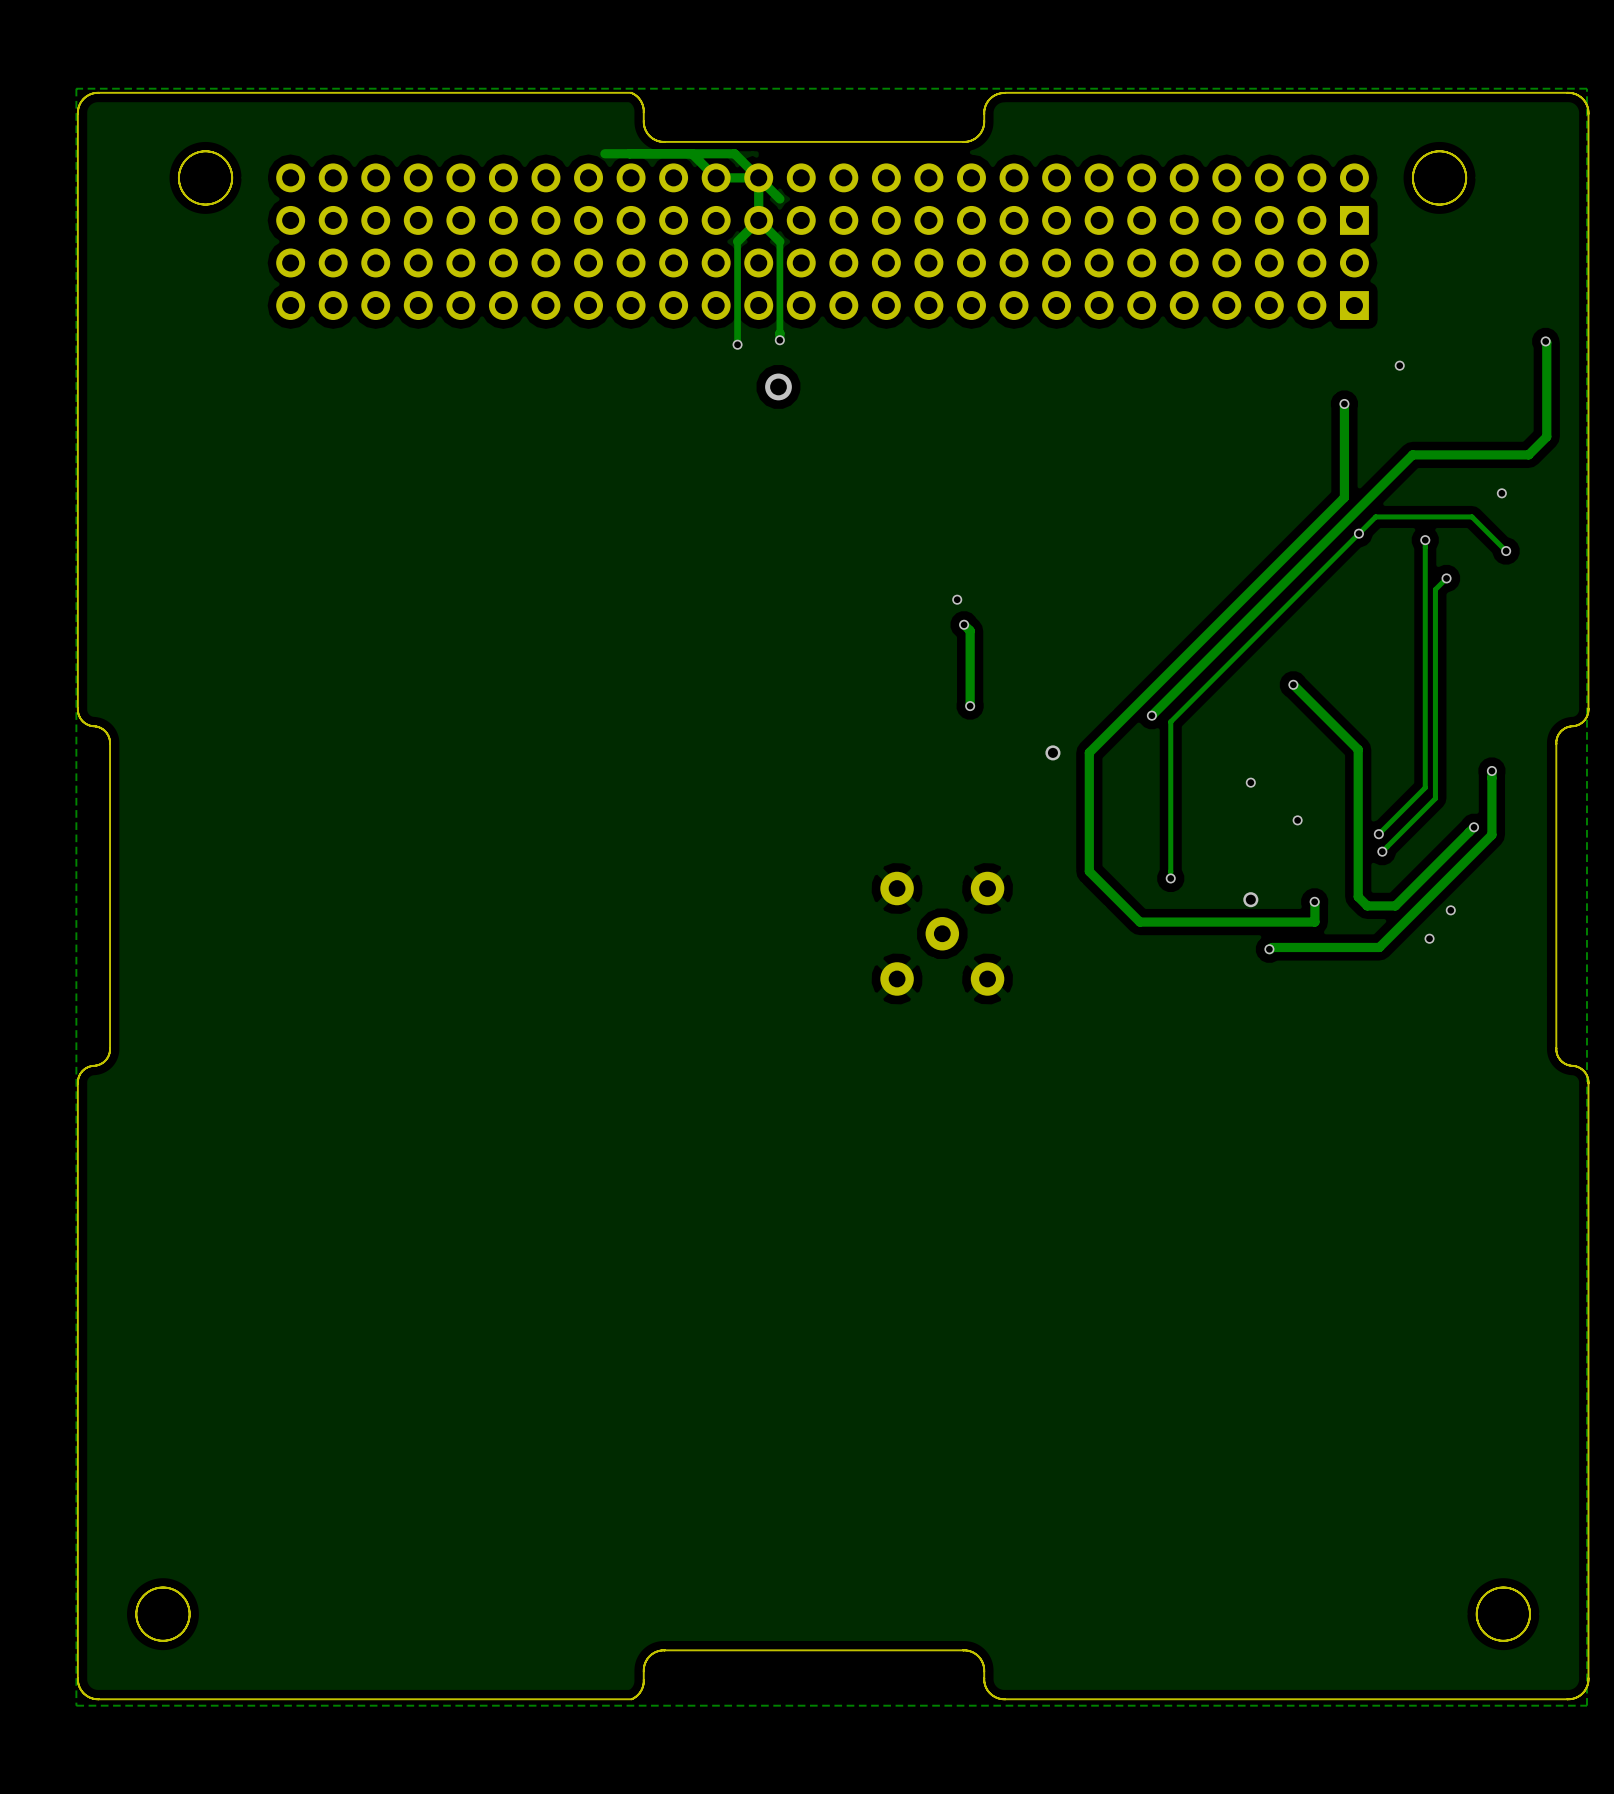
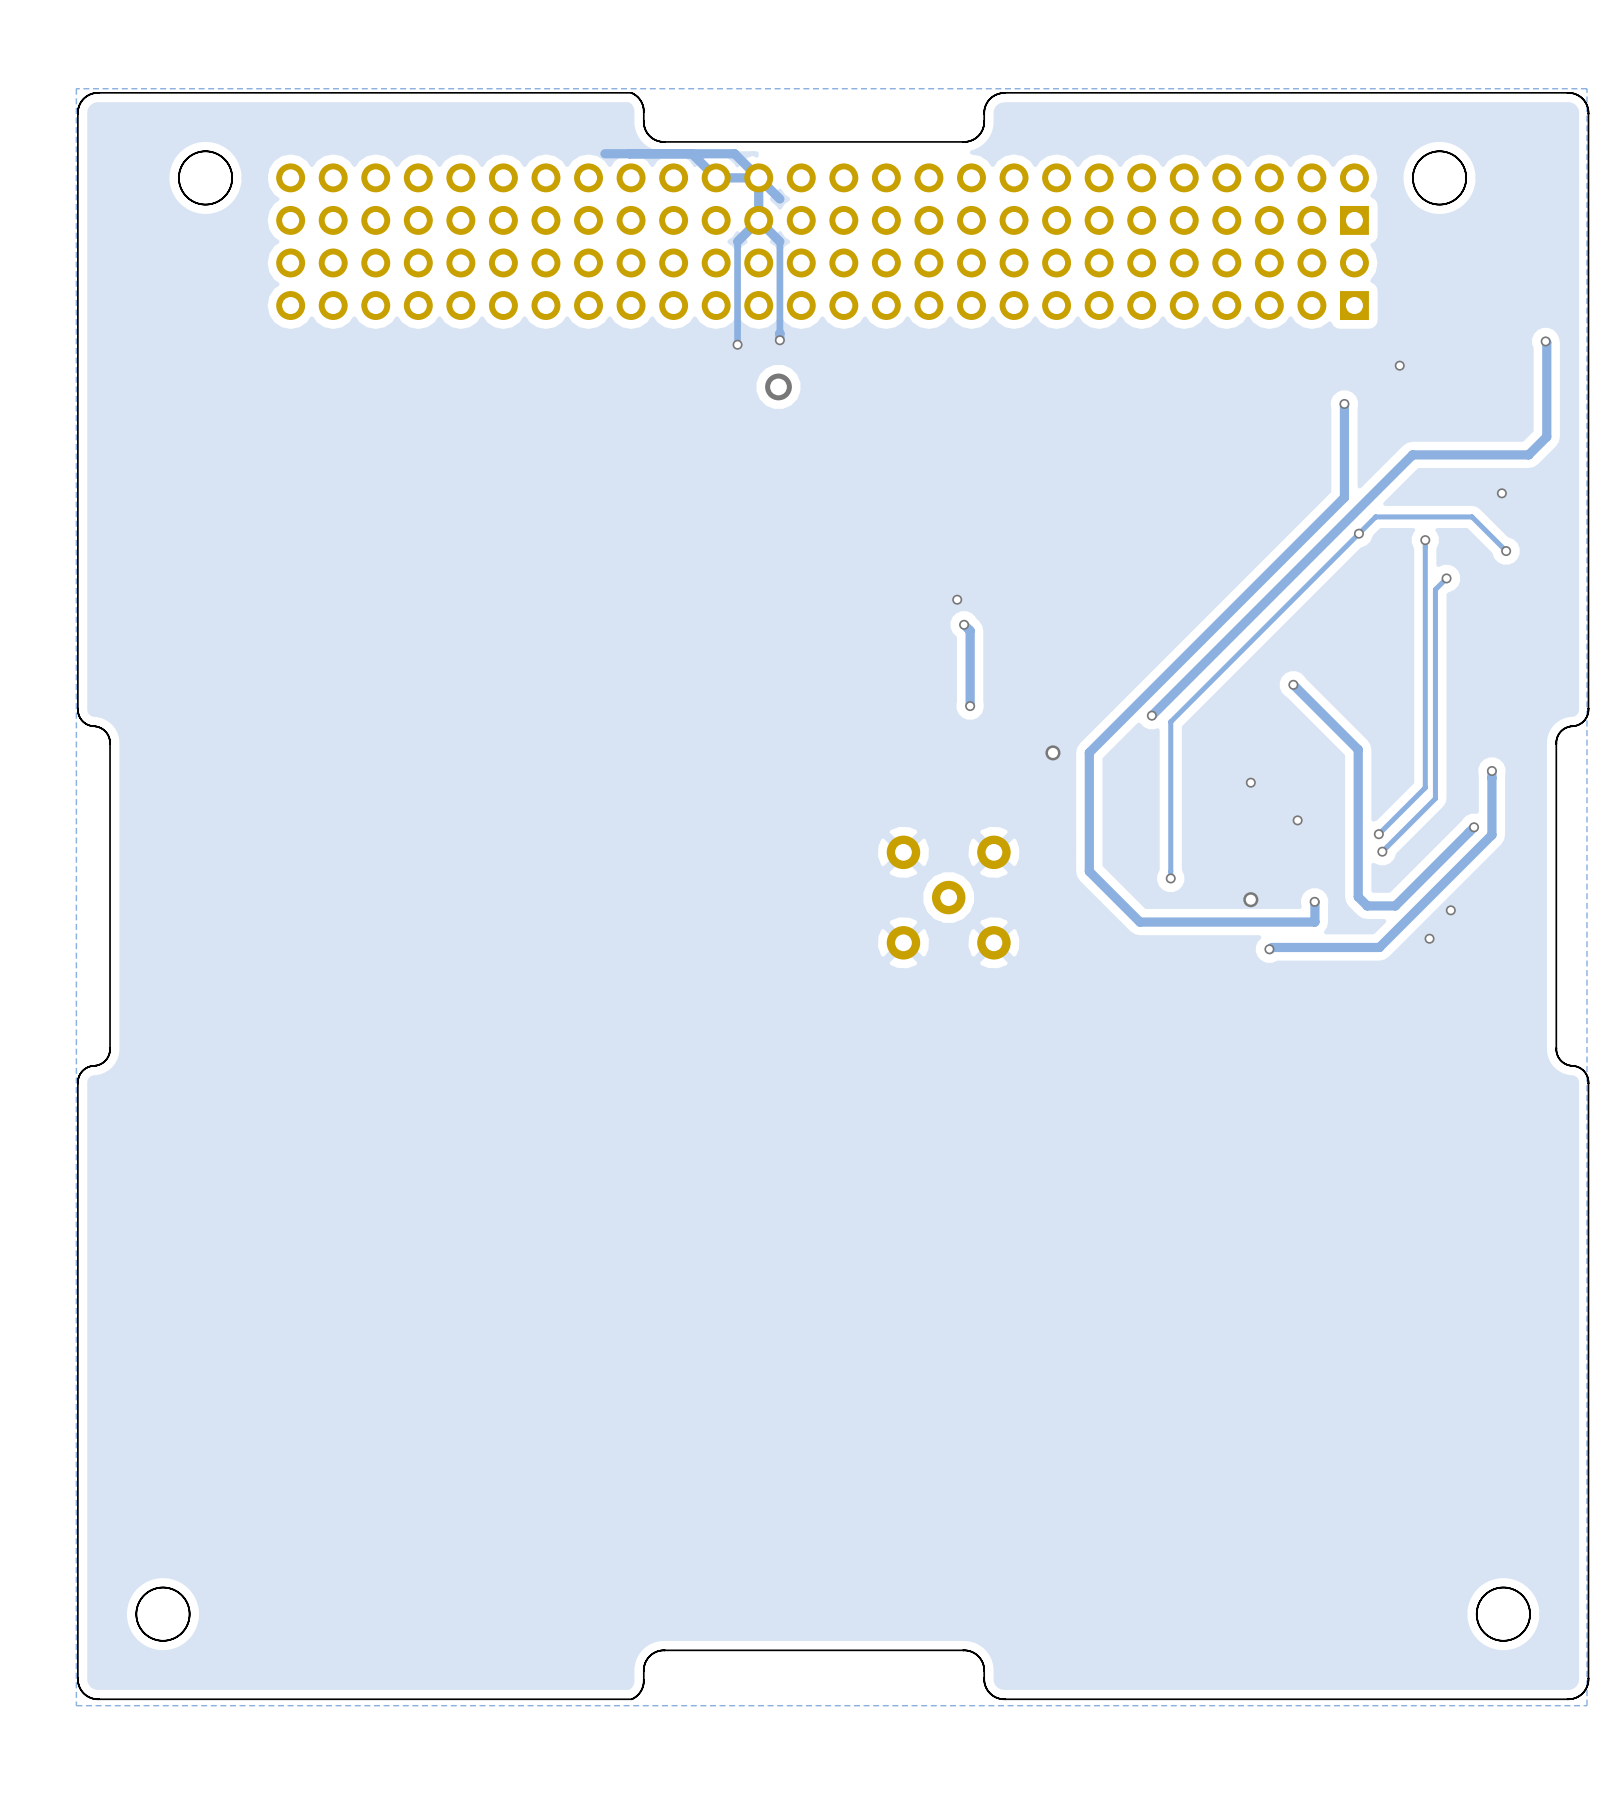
part position: (942, 933) -> (948, 897)

